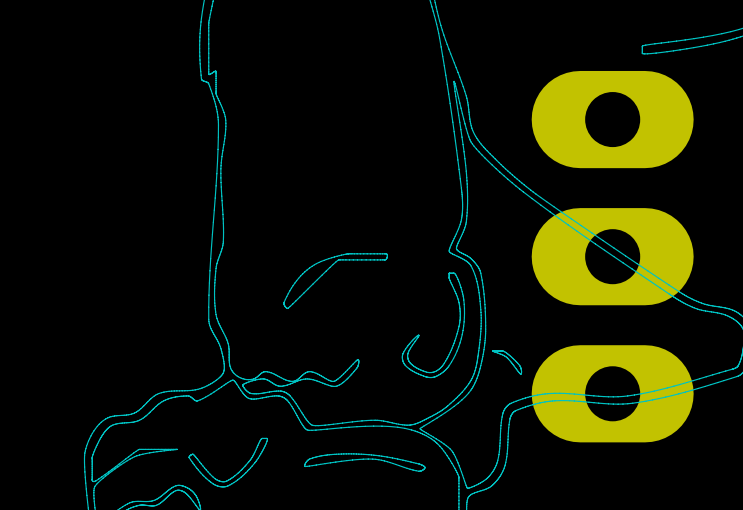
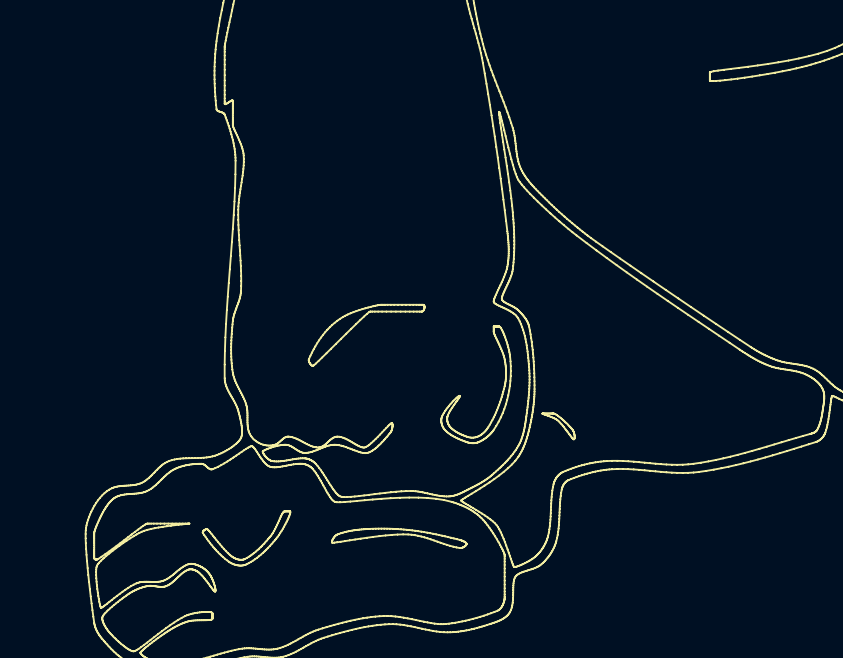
part: (612, 256) -> none

